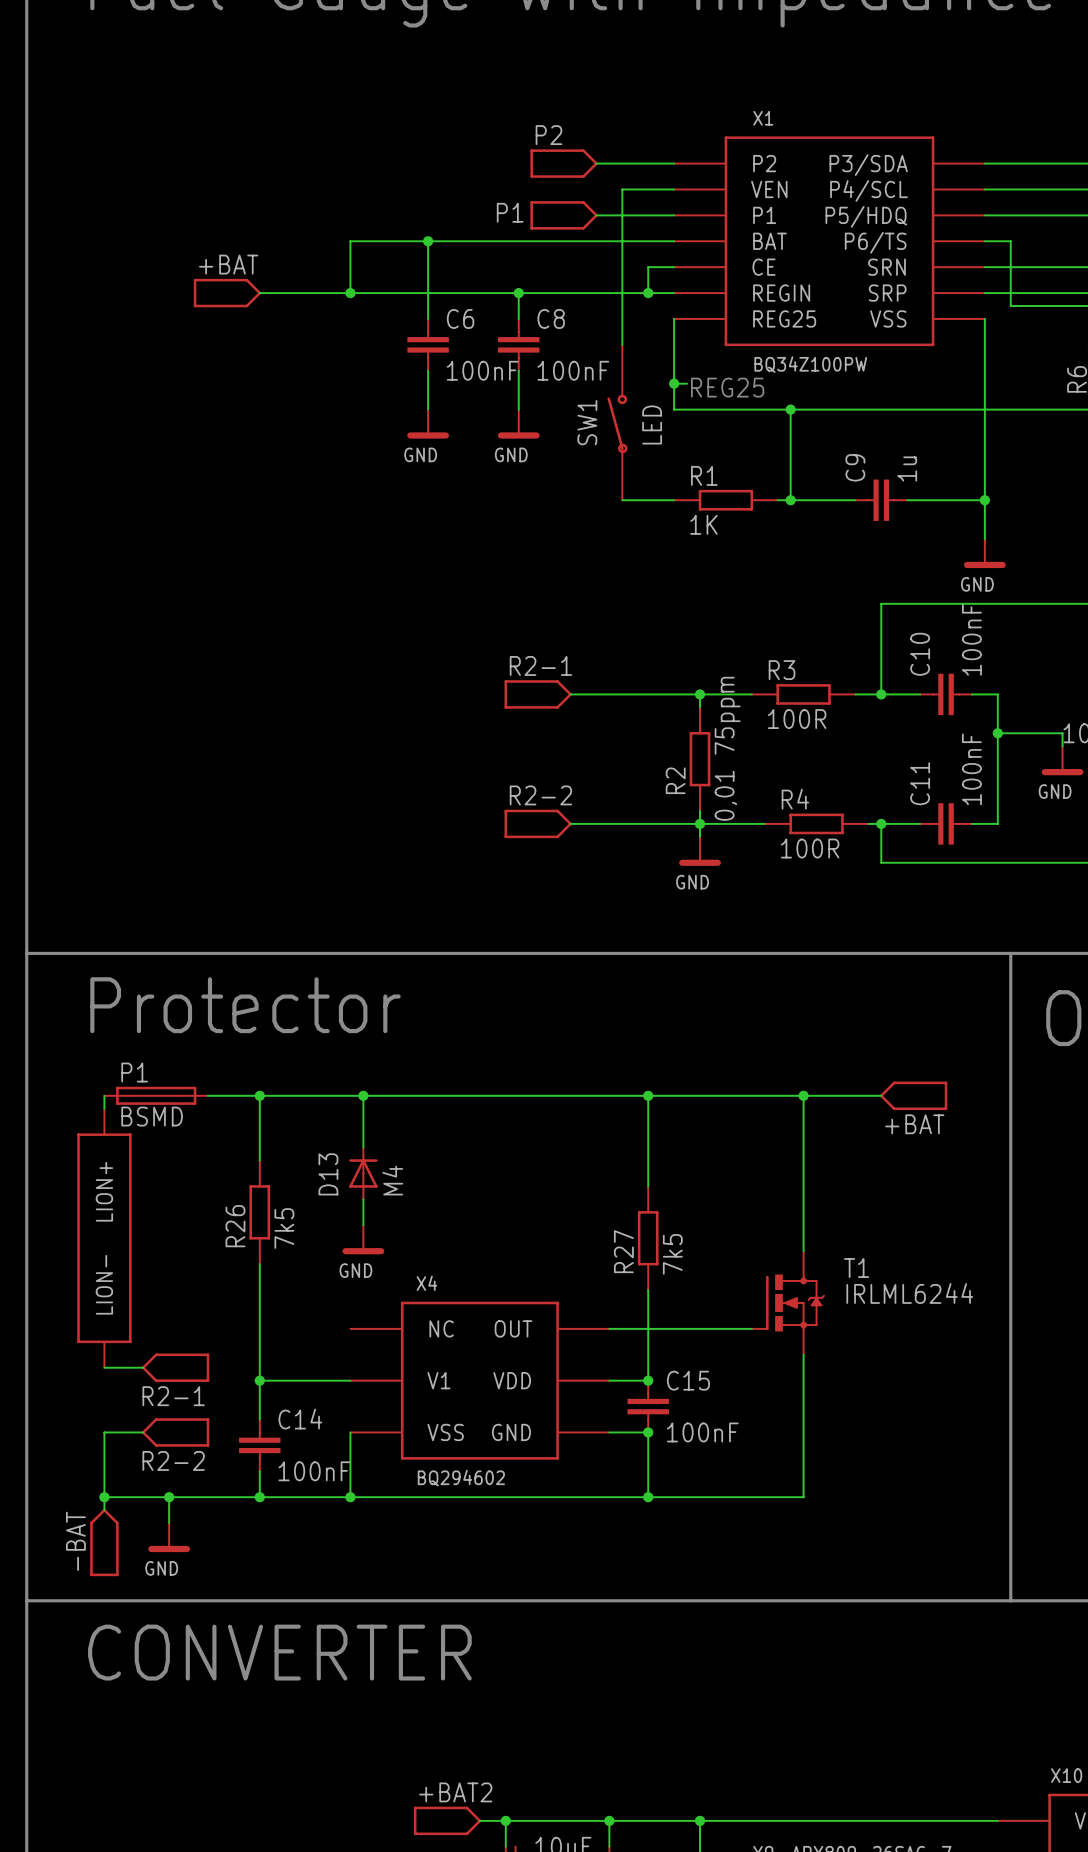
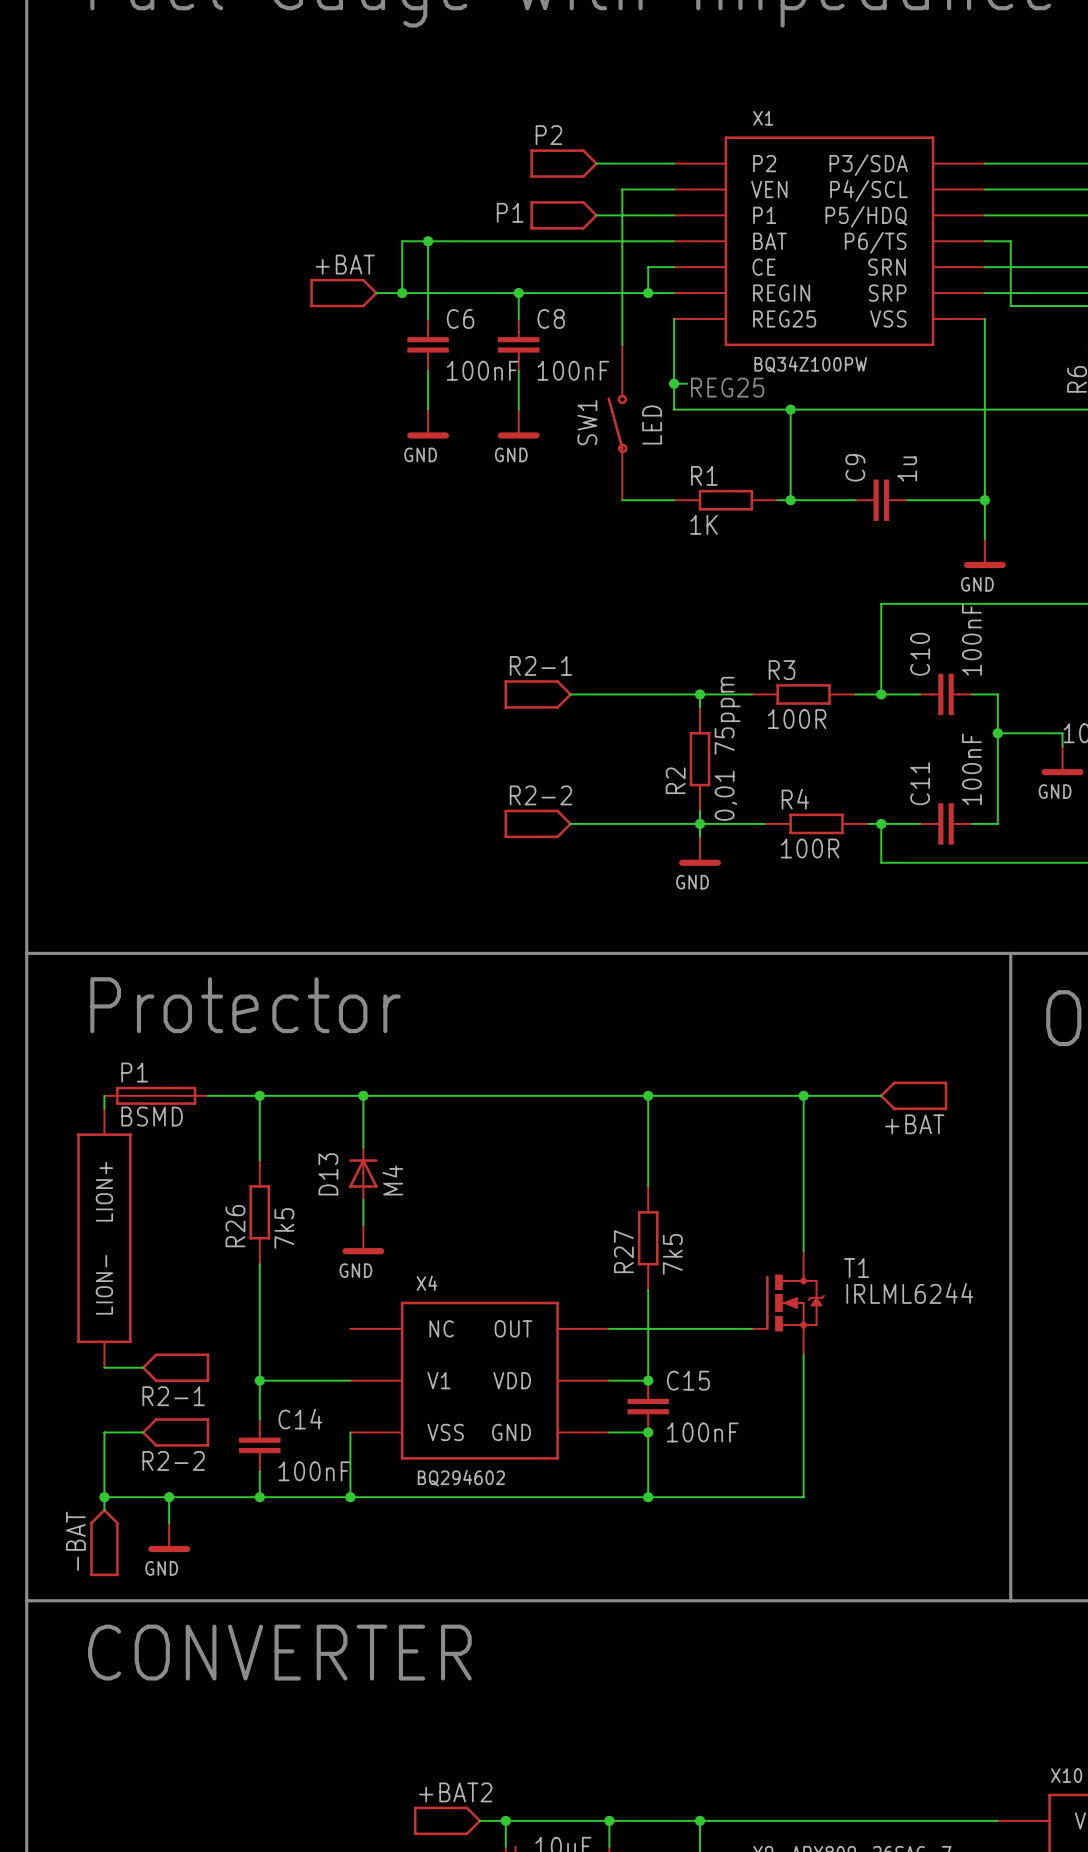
wire: (402, 241) (350, 241) (350, 293) -> (402, 241) (402, 293)
part position: (227, 293) -> (343, 293)
wire: (259, 293) (376, 293) -> none
junction position: (350, 293) -> (402, 293)

